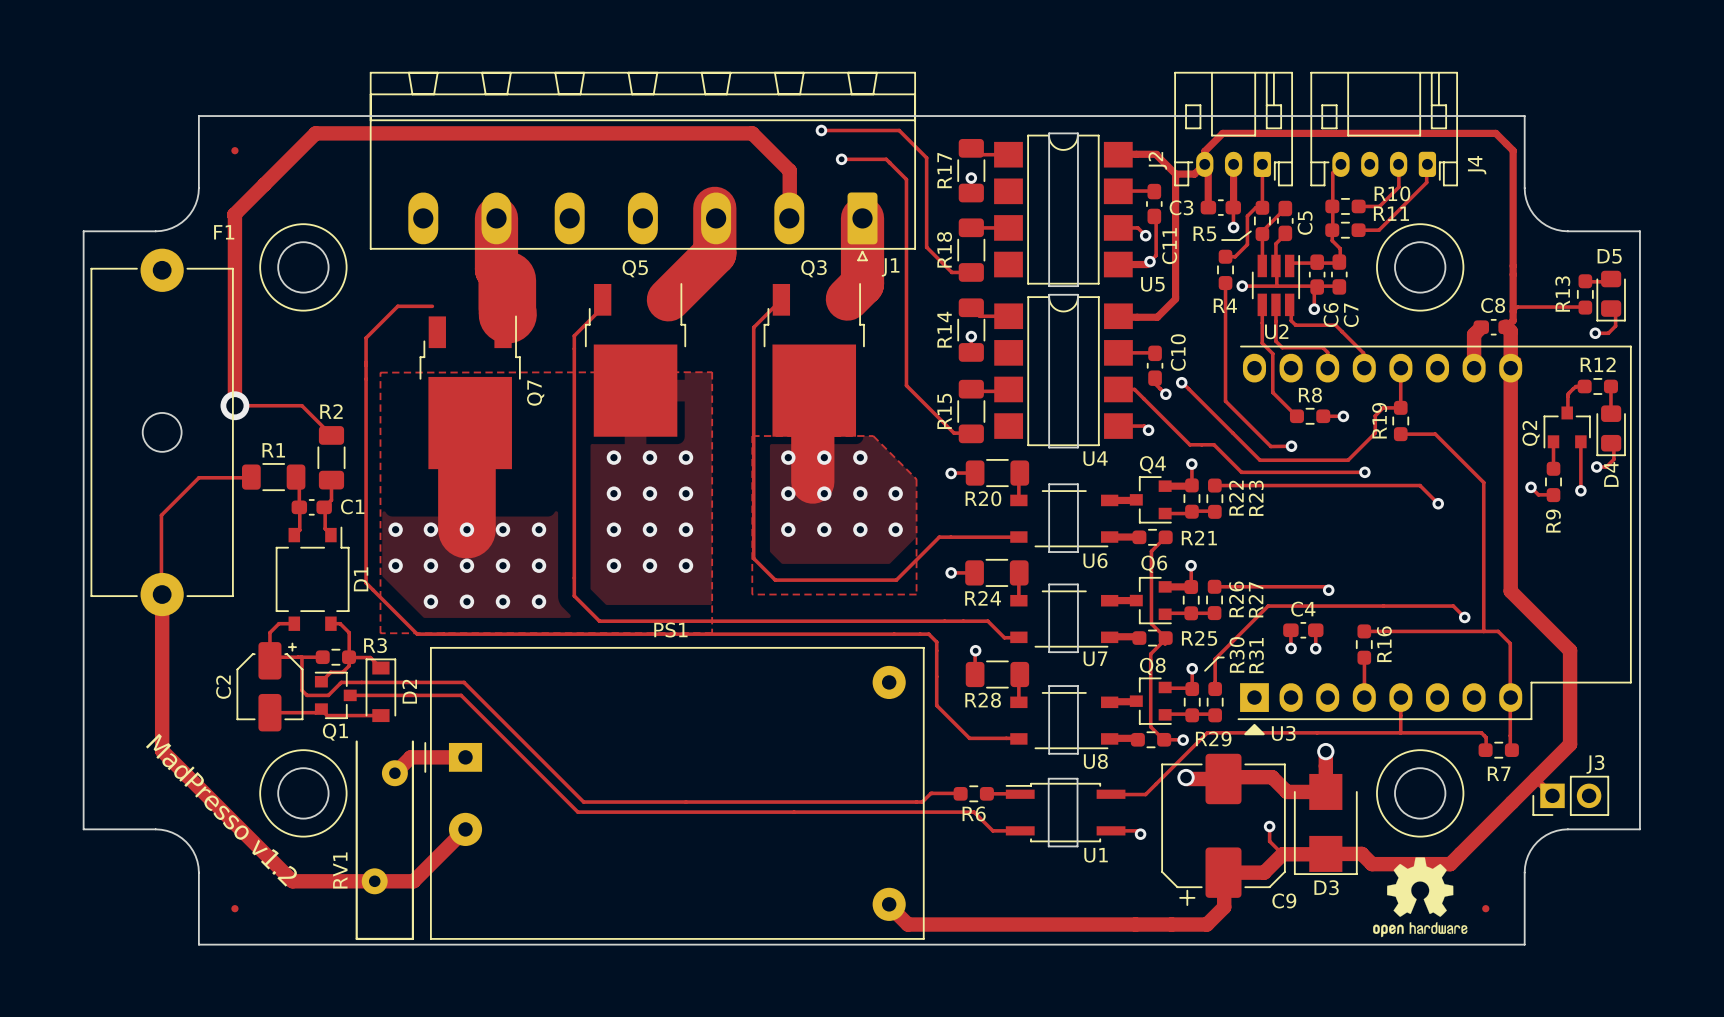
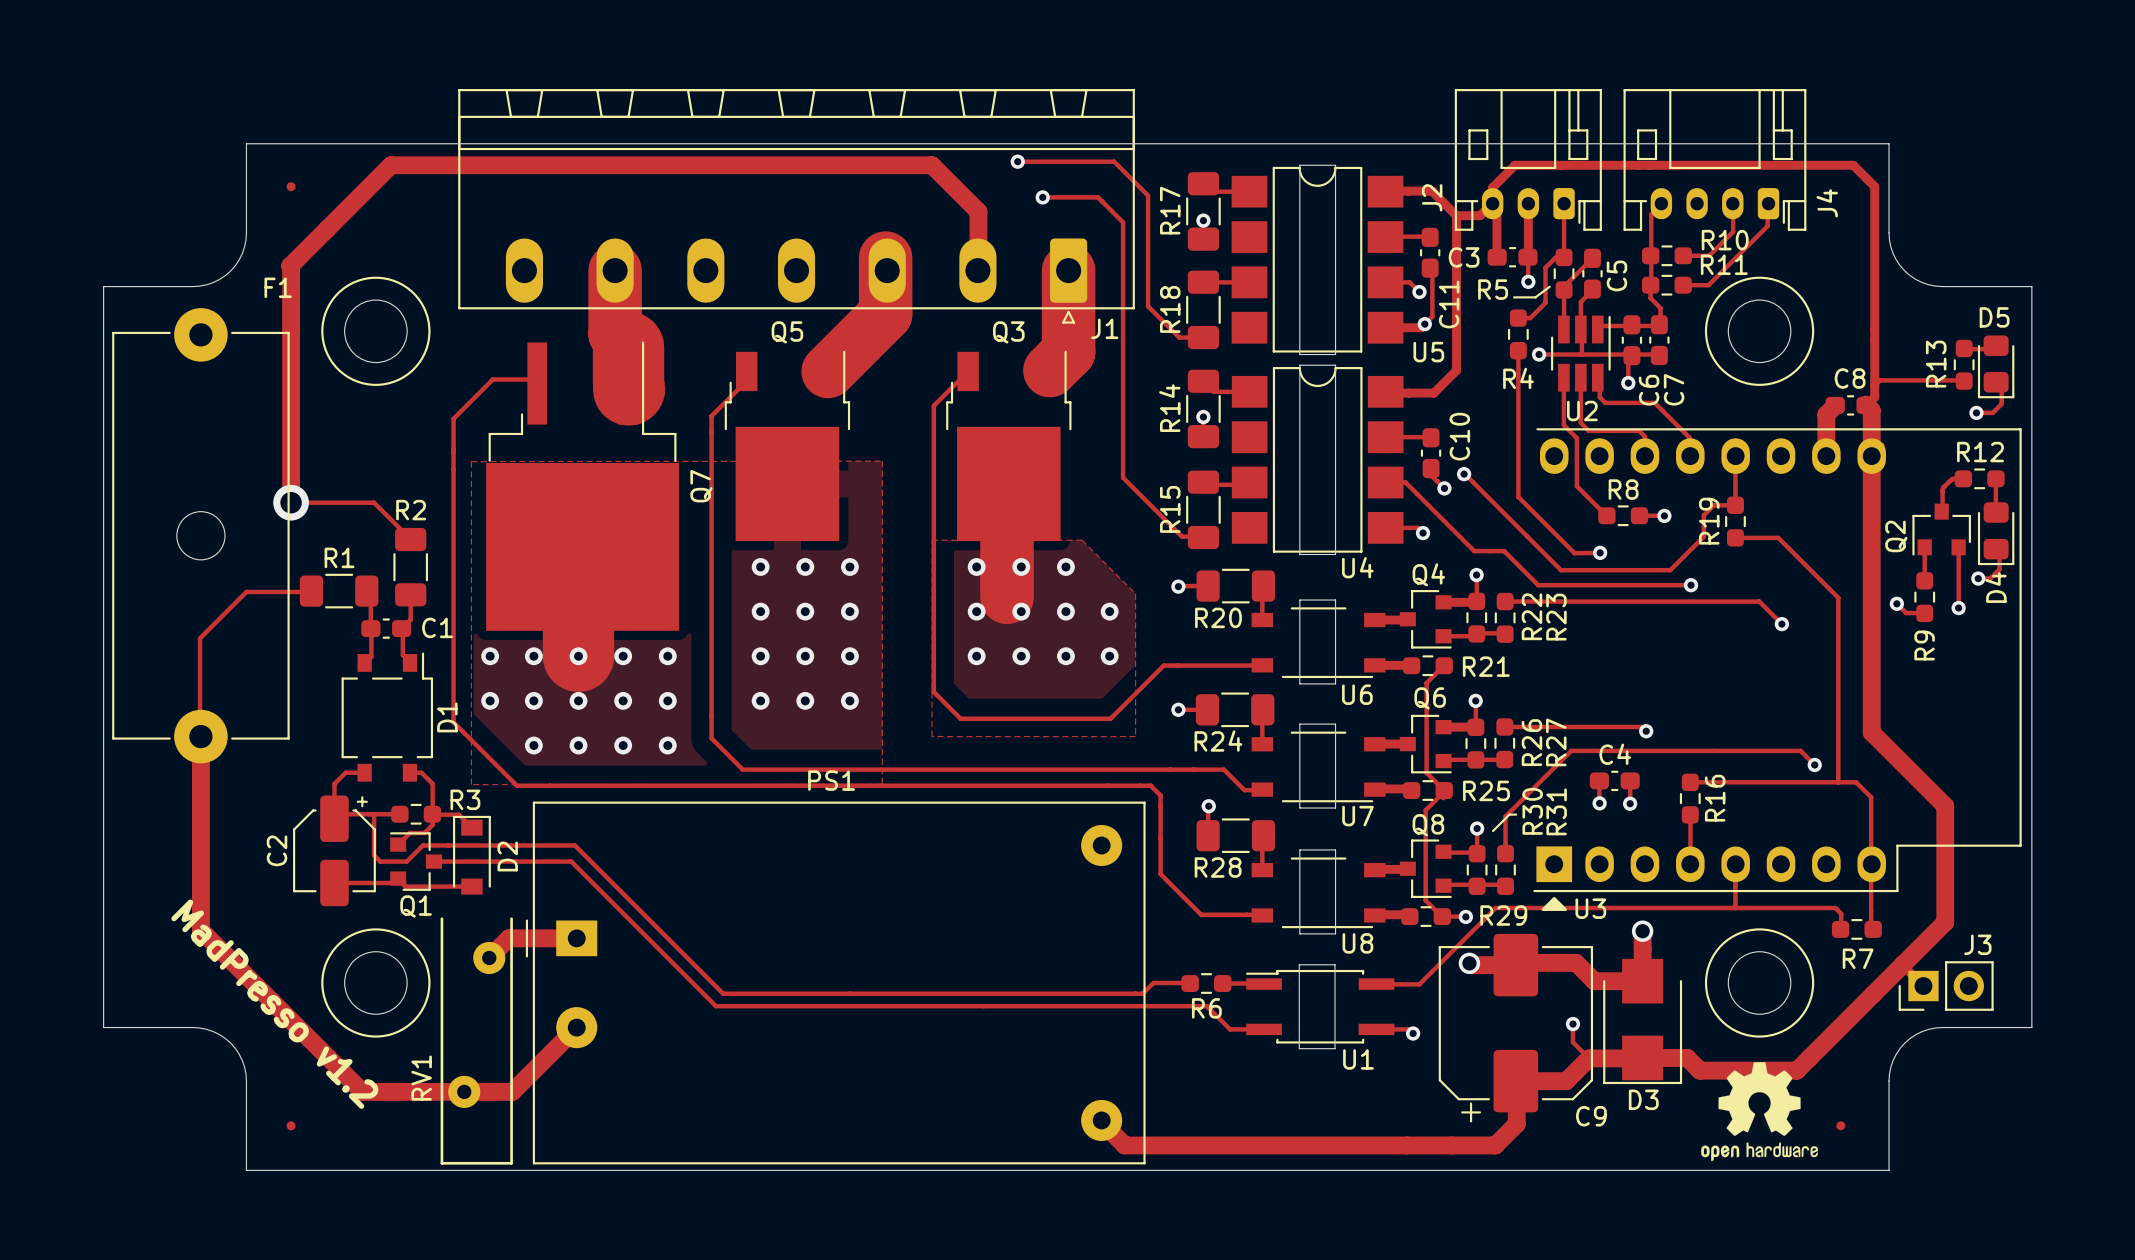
Q7 footprint: [419, 315, 521, 470] -> [486, 341, 679, 631]
Q7 name position: Q7 (535, 393) -> Q7 (701, 486)

